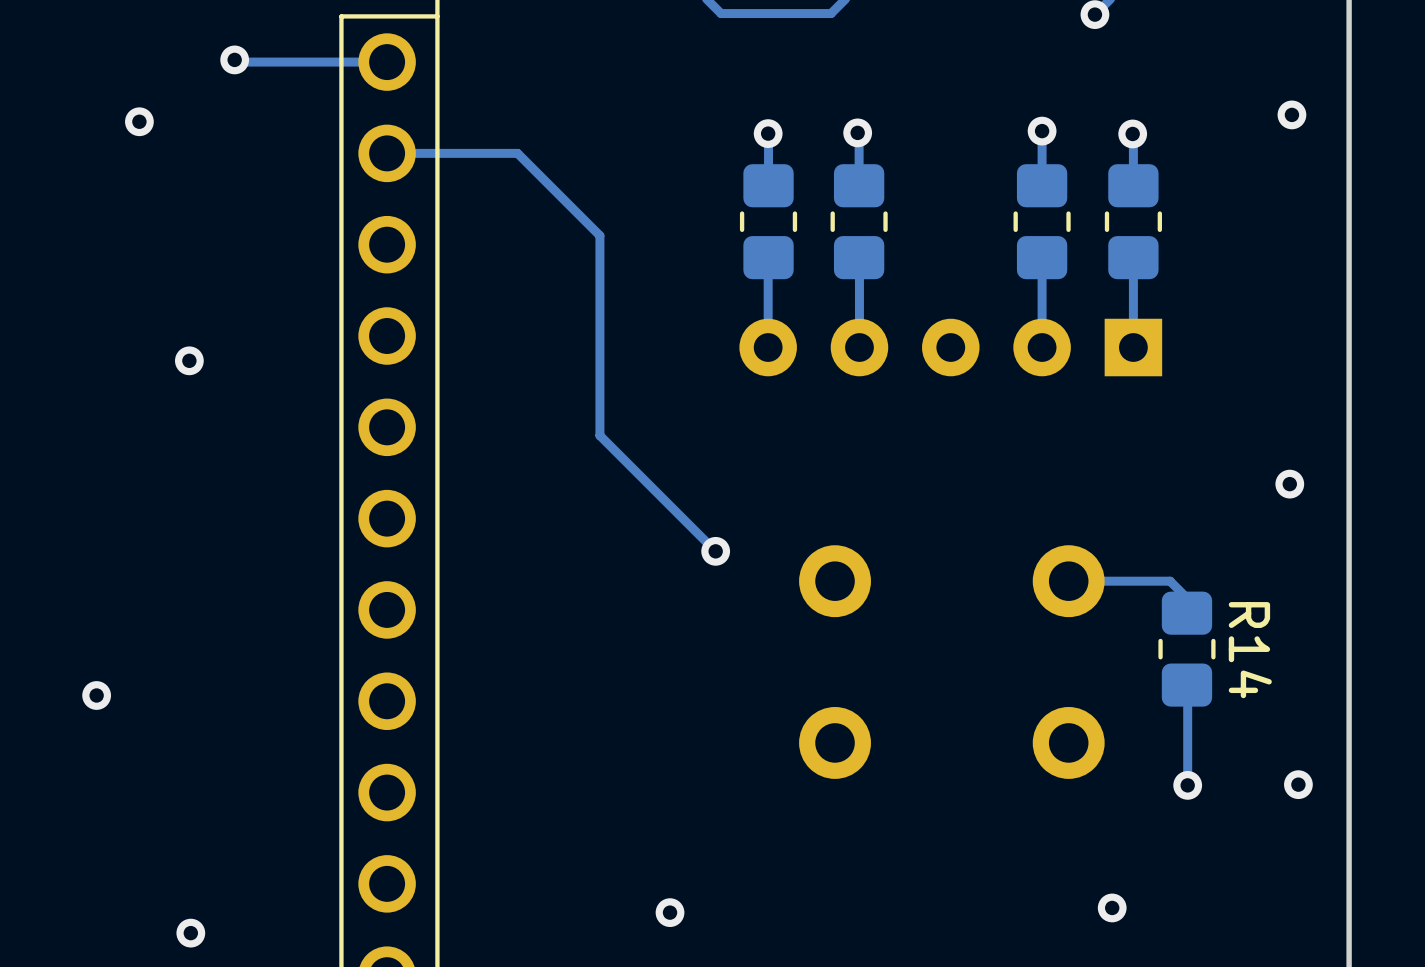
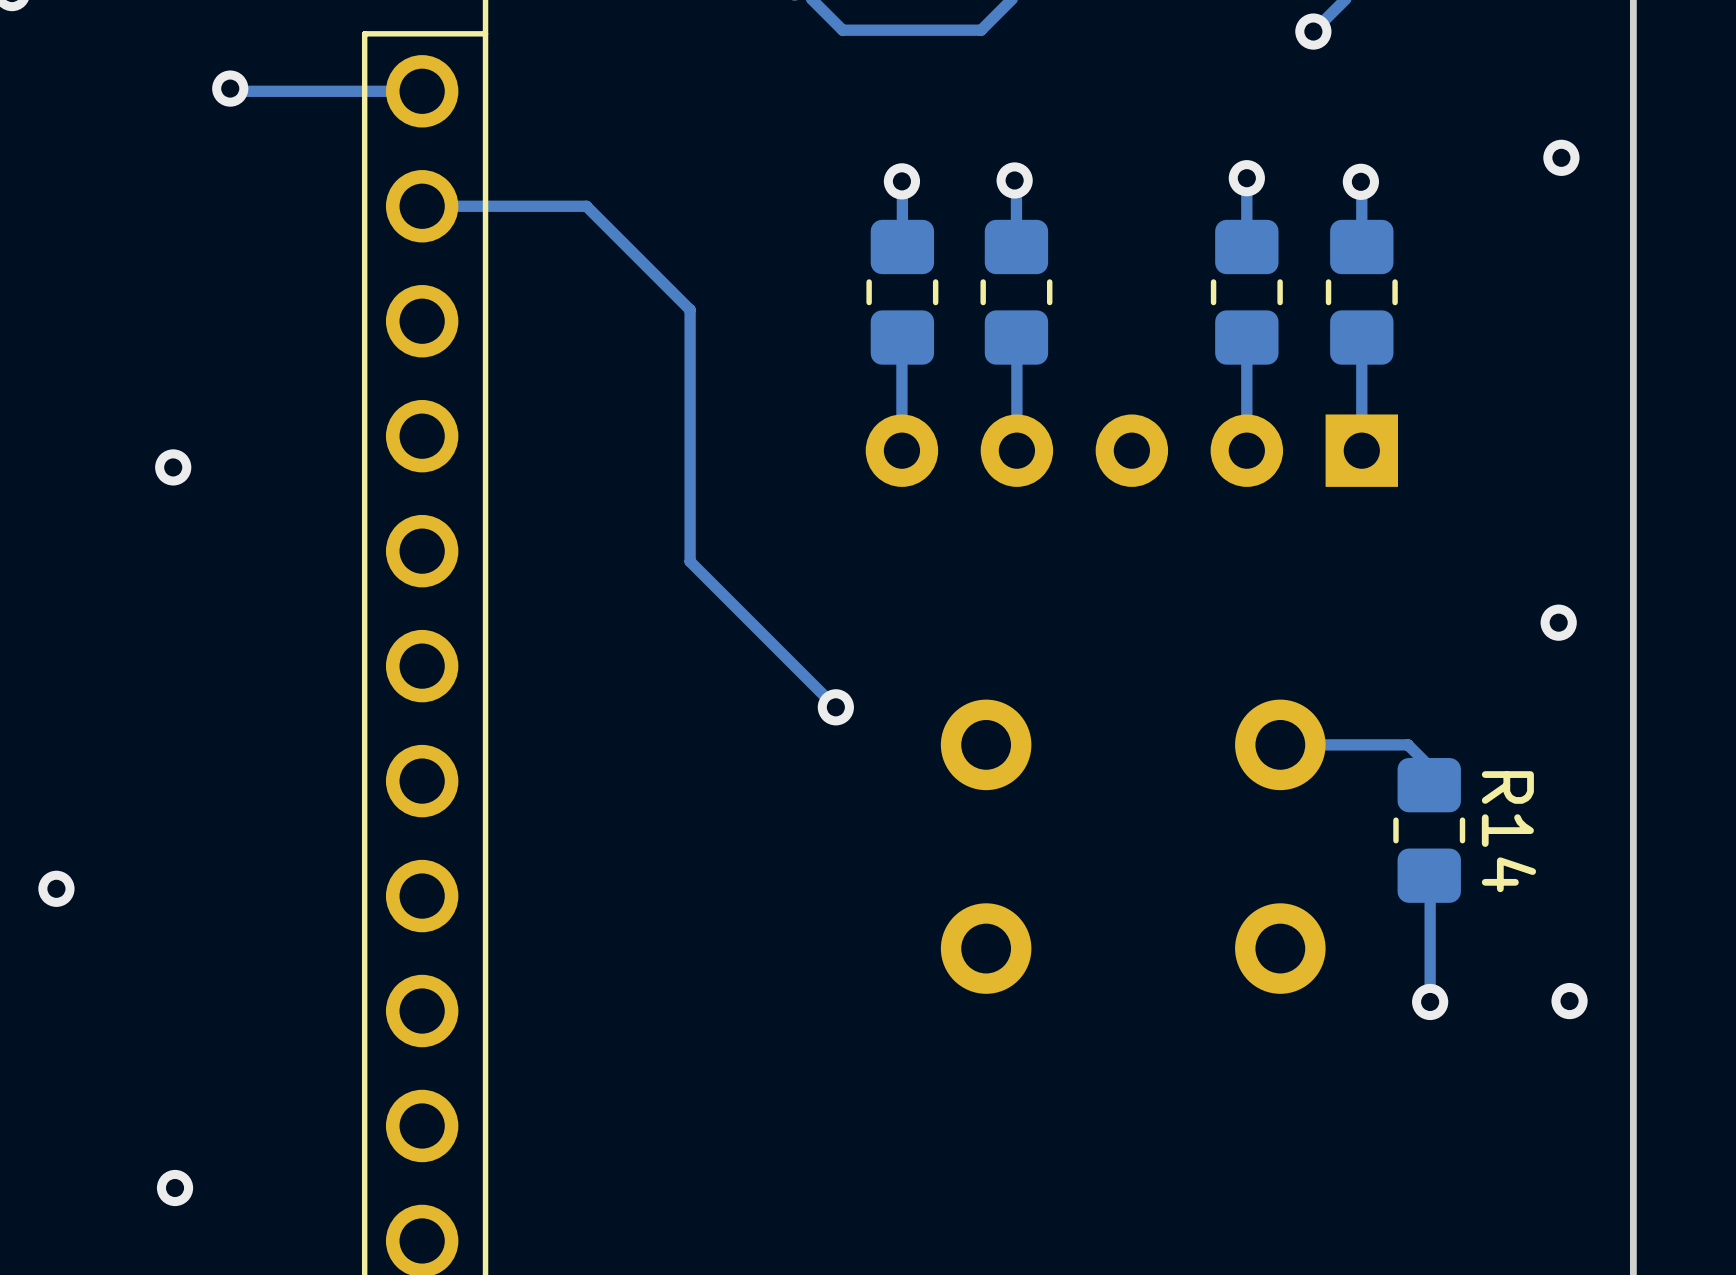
via: (139, 121) -> none
via: (1112, 907) -> none
via: (670, 912) -> none

